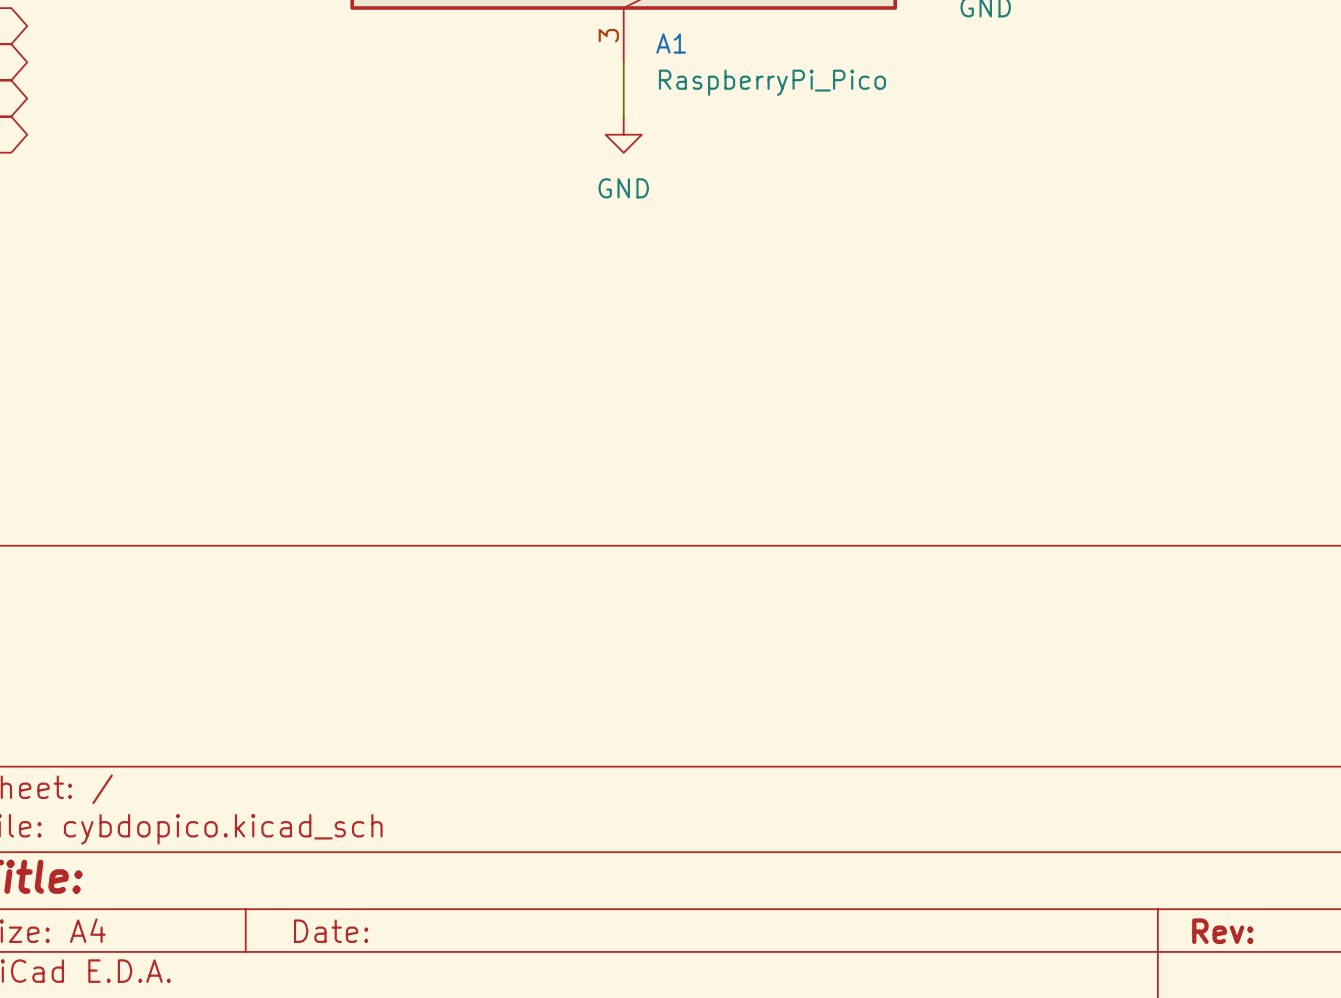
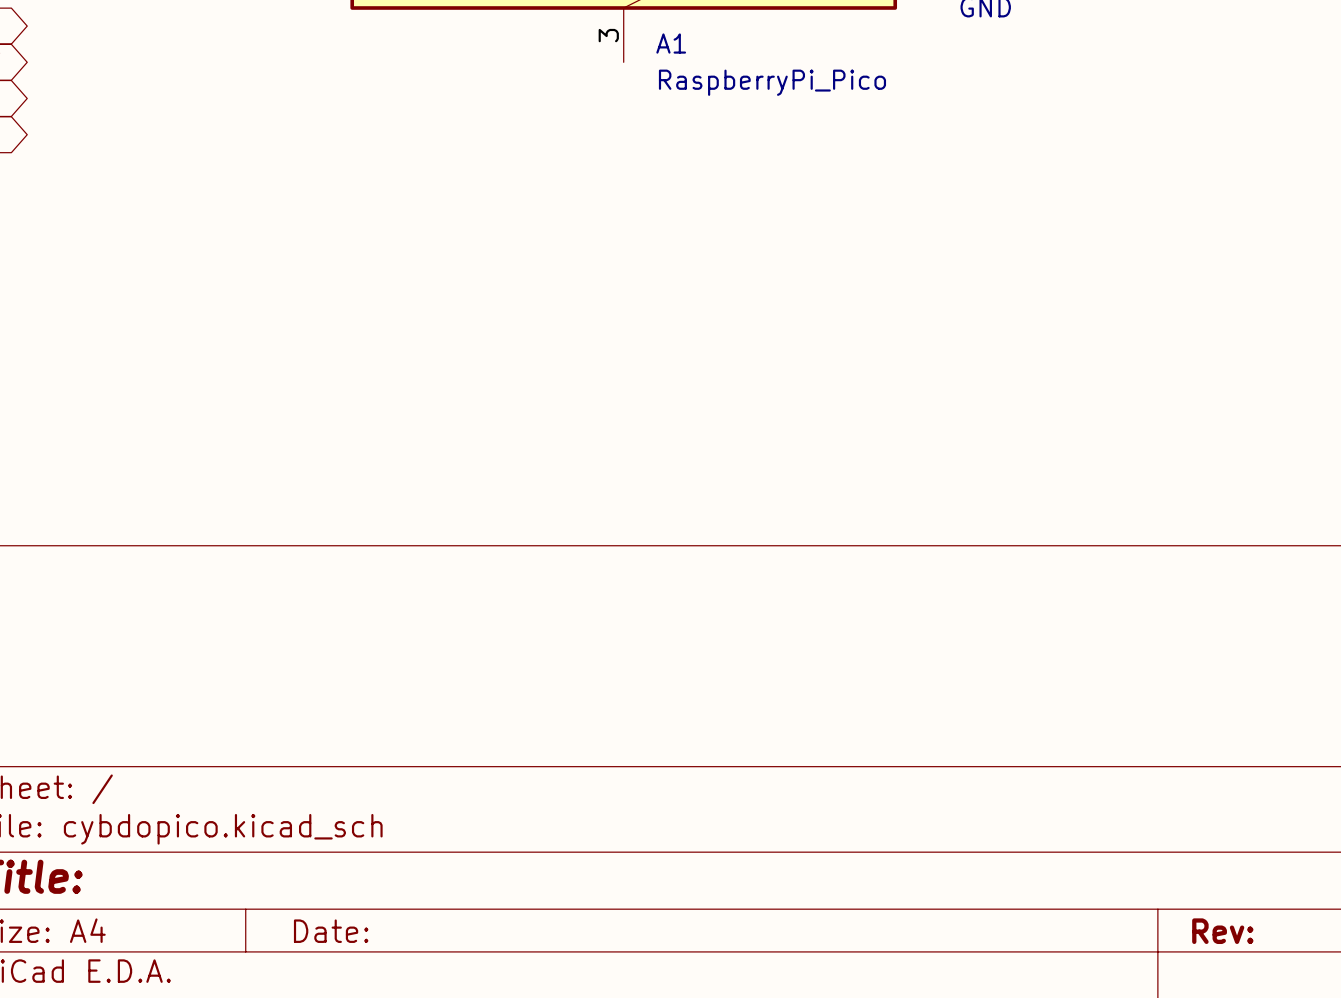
wire: (623, 62) (623, 116) -> none
power symbol: GND (623, 134) -> none

